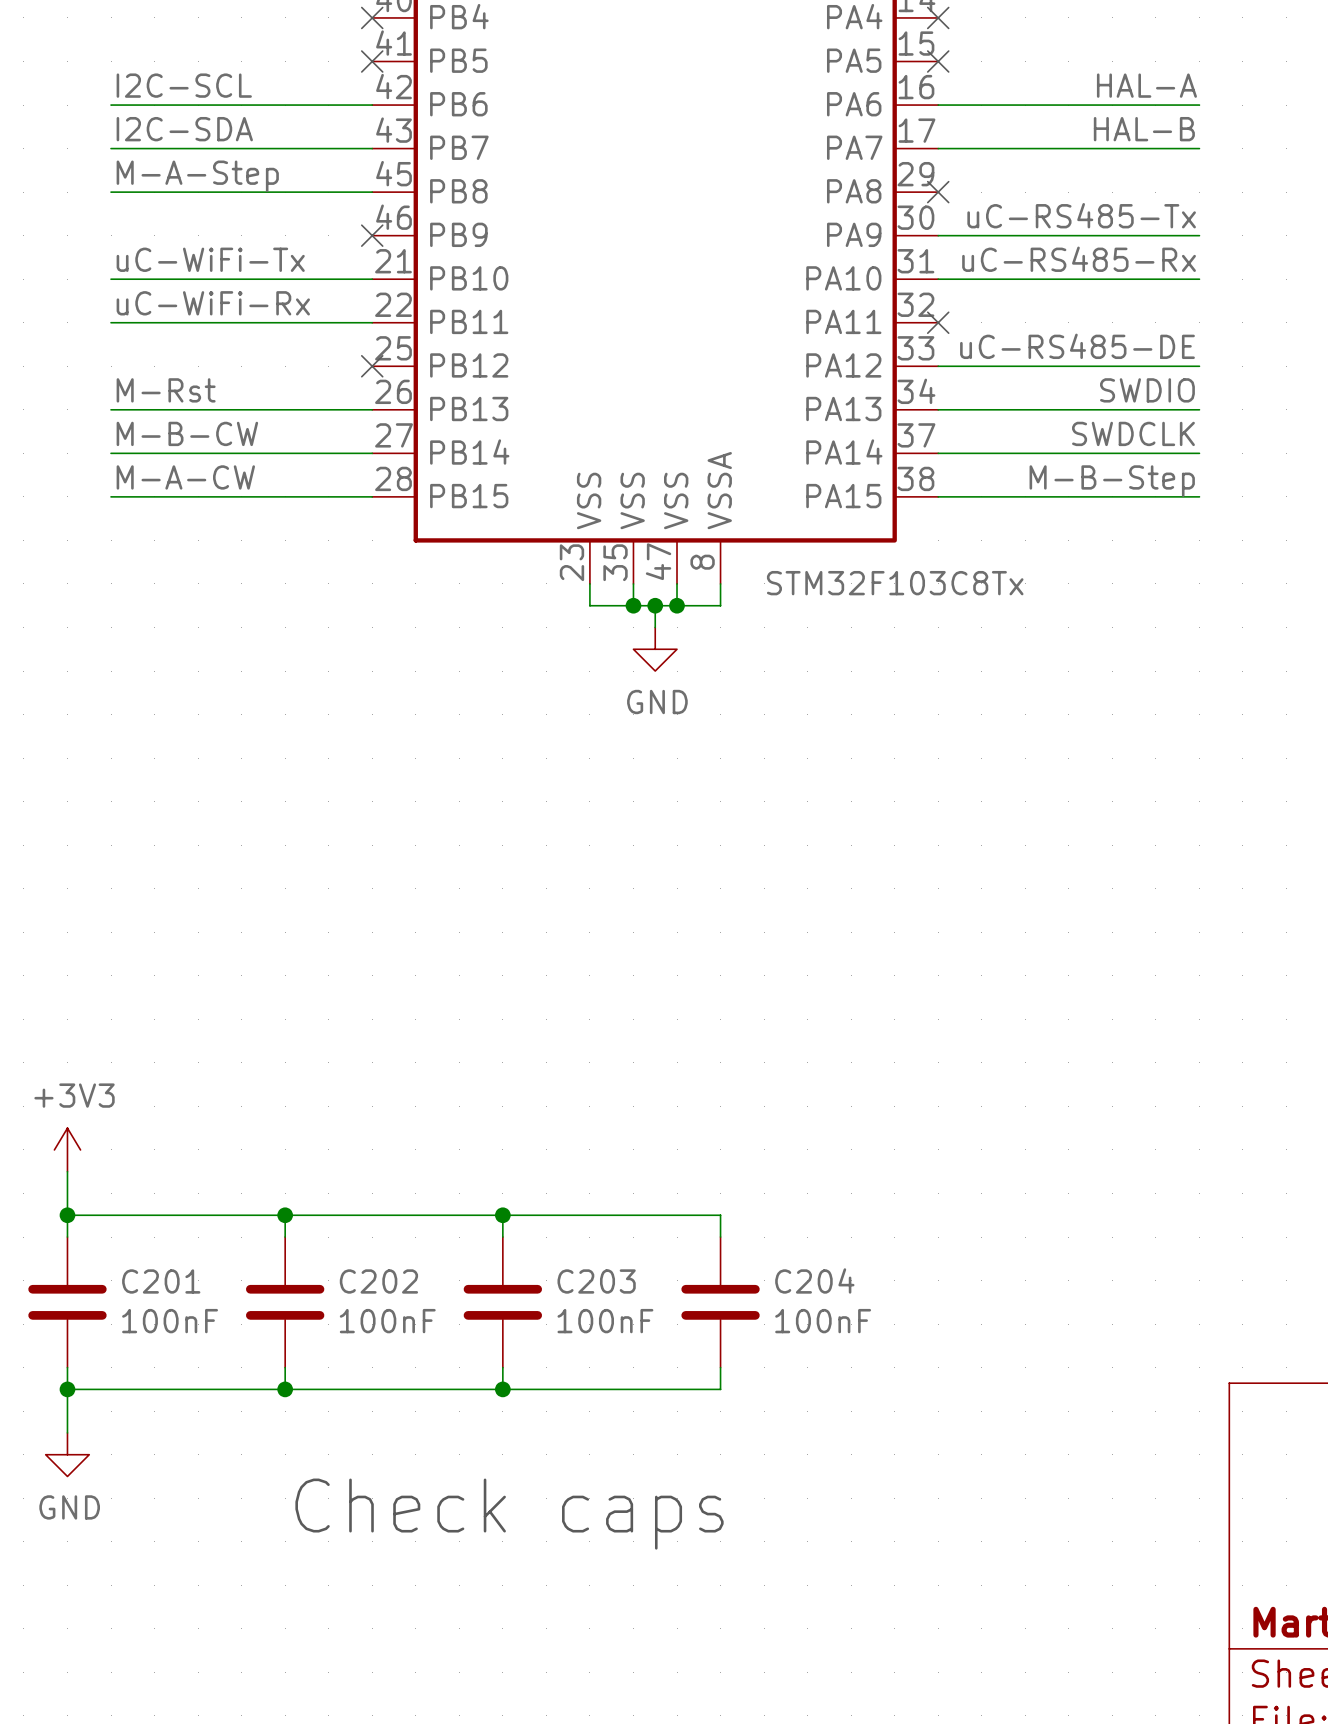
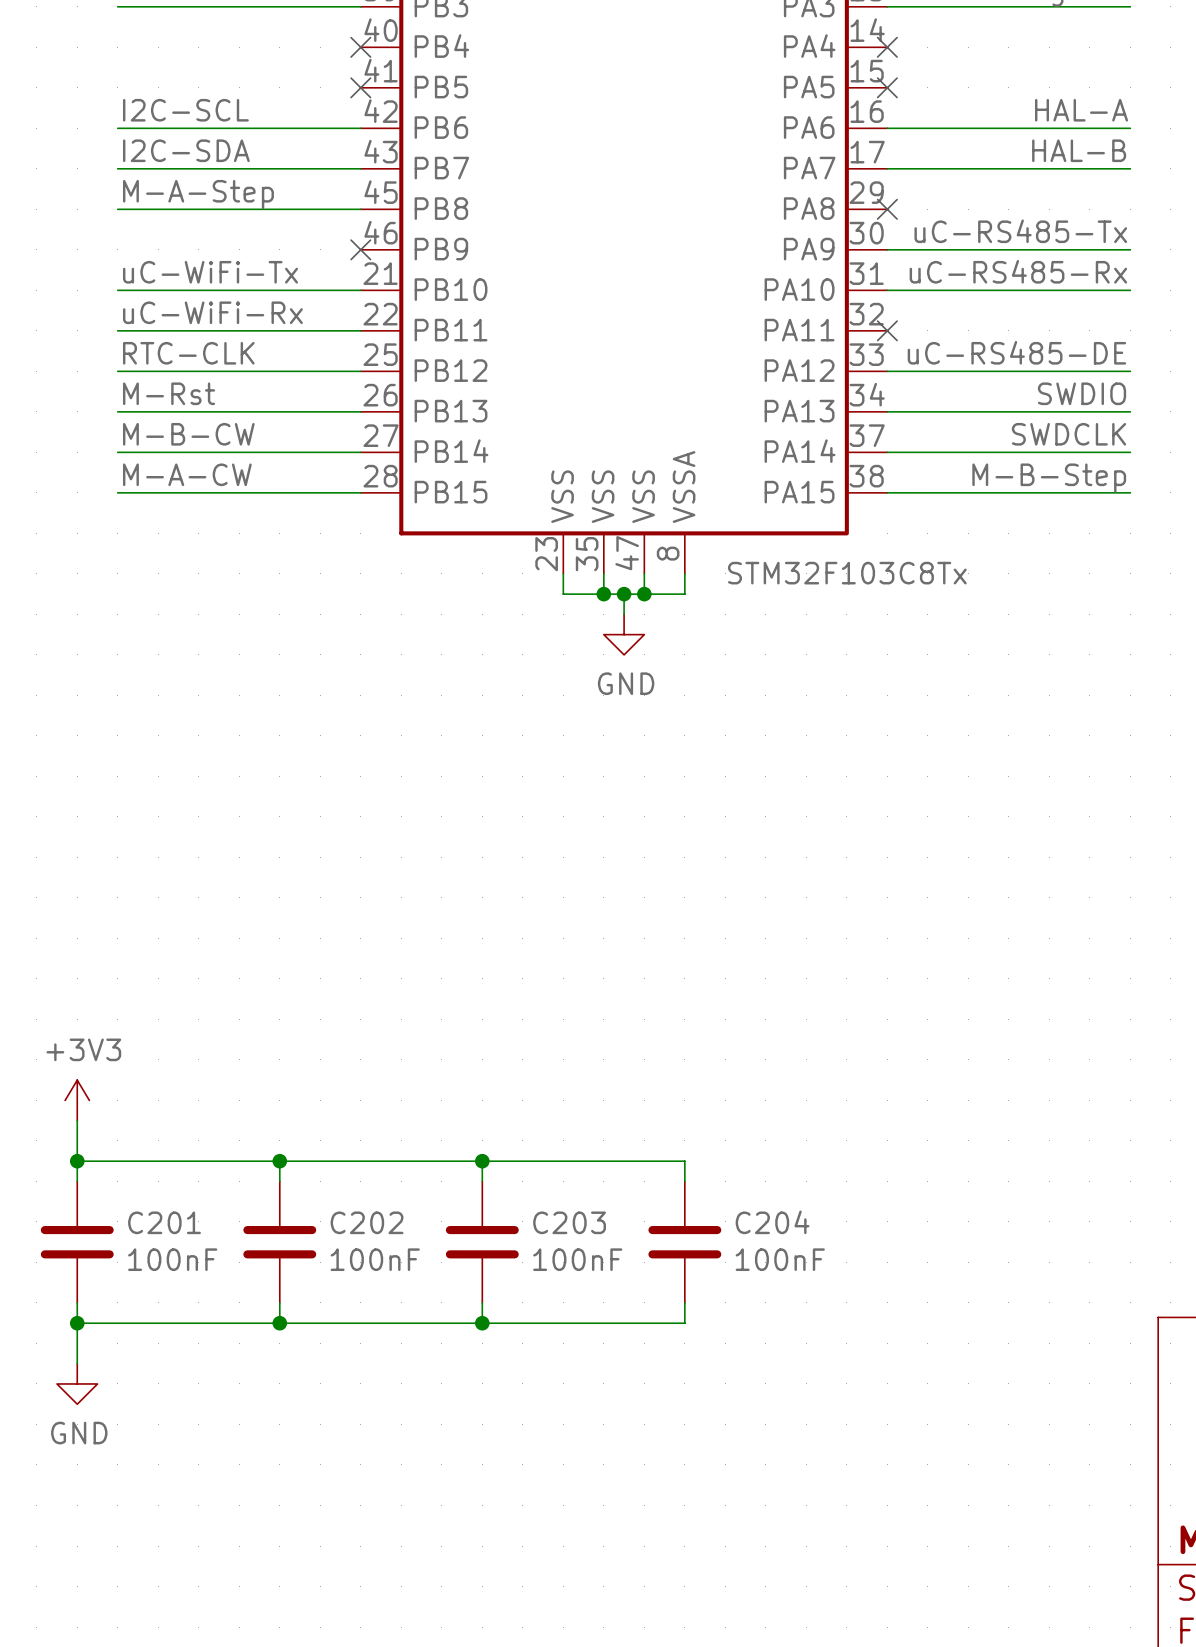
label: none -> RTC-CLK (188, 353)
wire: none -> (117, 371) (360, 371)
no-connect mark: (372, 366) -> none
text: Check caps (509, 1514) -> none

